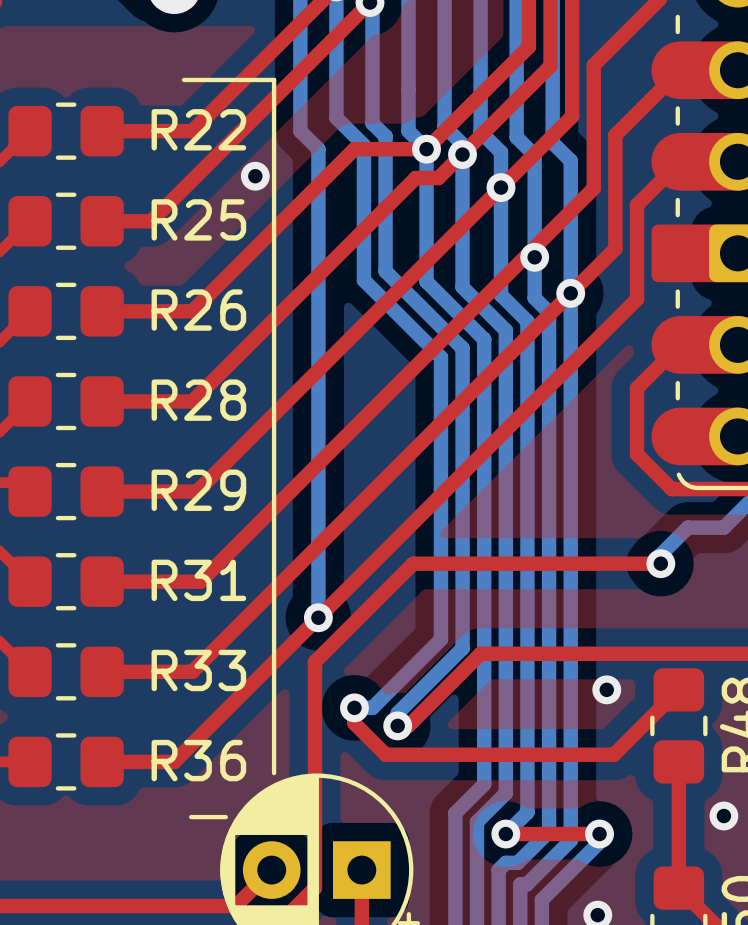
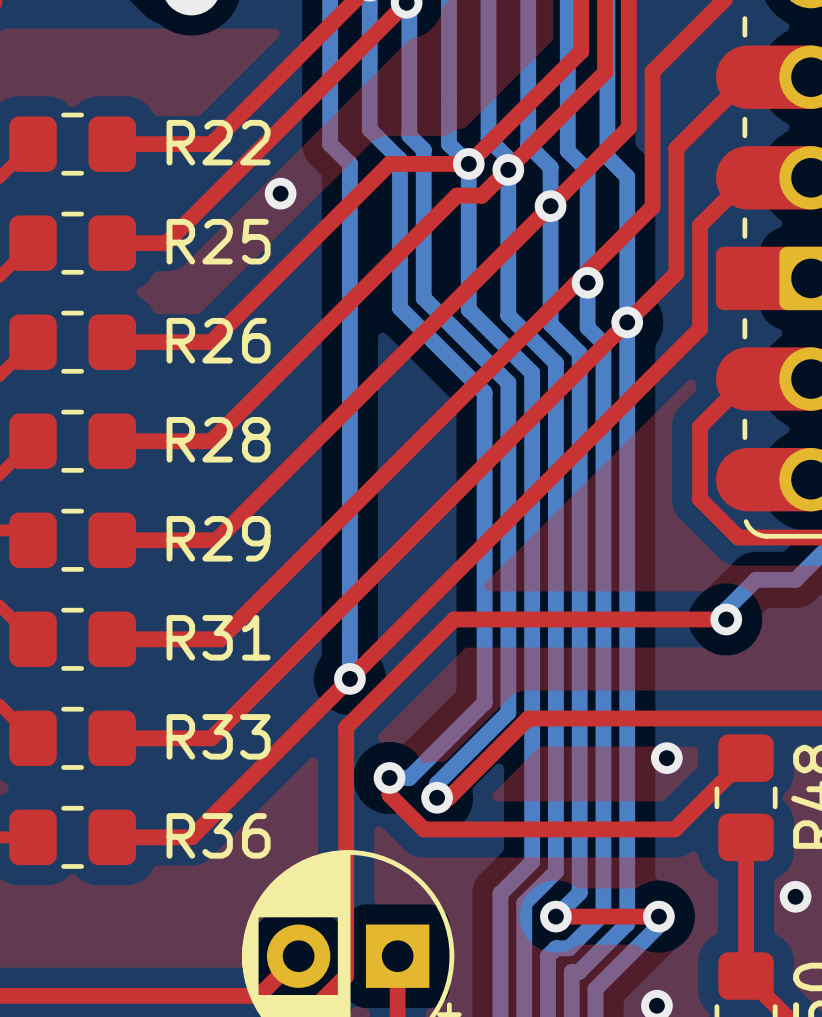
line: (183, 79) (274, 79) (274, 773) -> none
line: (191, 817) (225, 817) -> none

